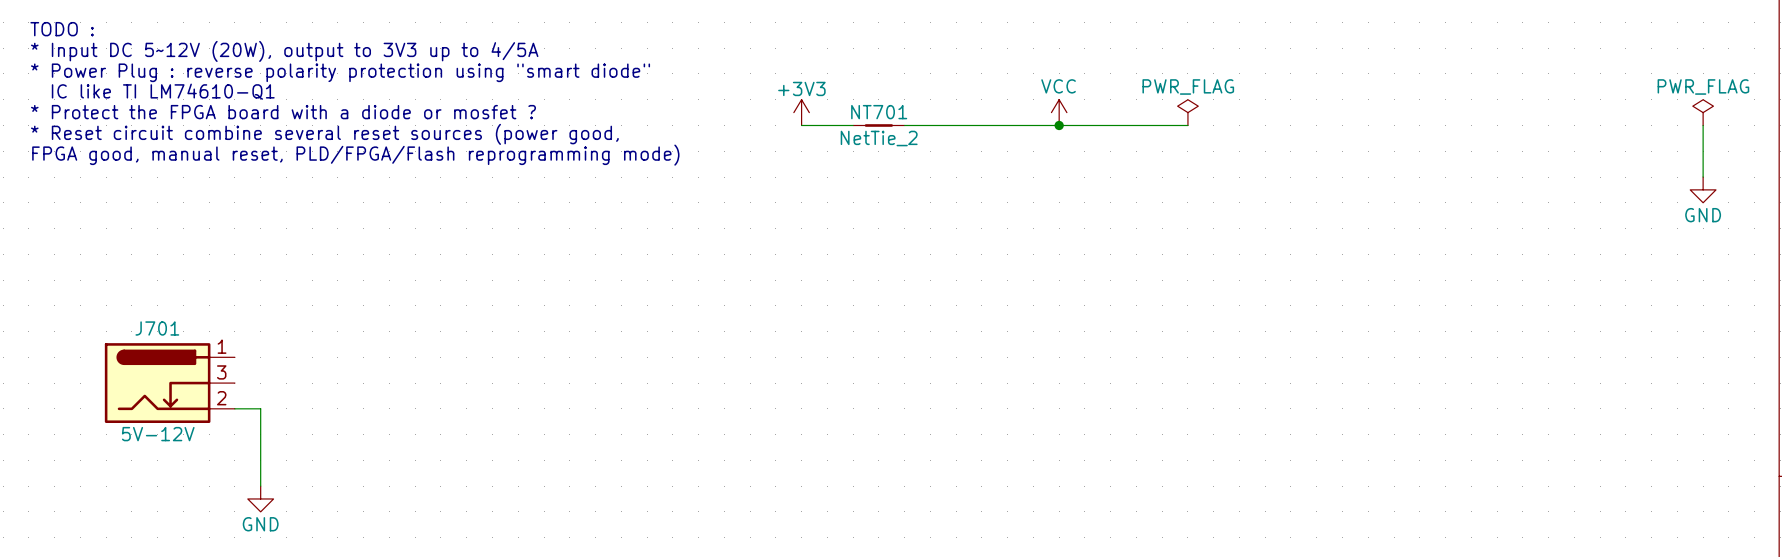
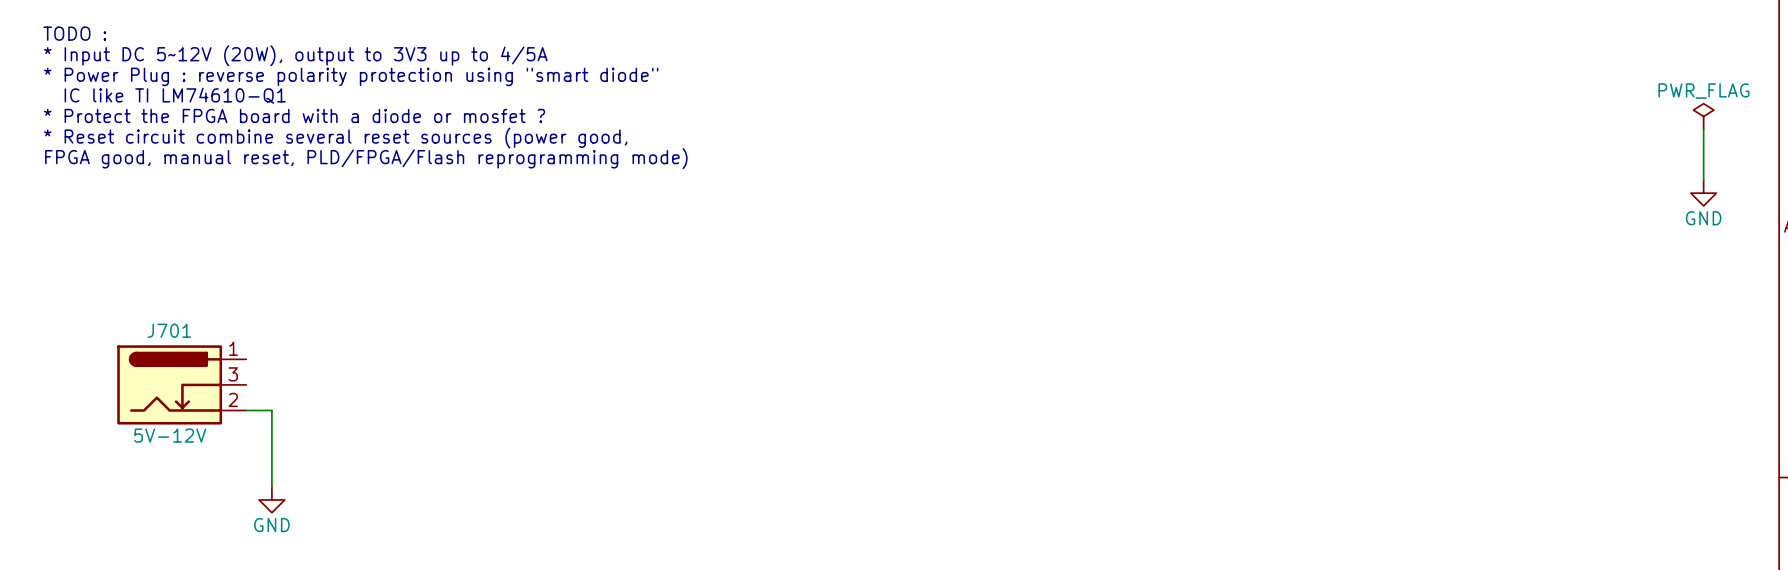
power symbol: +3V3 (801, 112) -> none
power symbol: VCC (1059, 112) -> none
power symbol: PWR_FLAG (1187, 112) -> none
wire: (801, 125) (853, 125) -> none
NT701: NetTie_2 (878, 125) -> none
wire: (904, 125) (1187, 125) -> none
junction: (1059, 125) -> none

